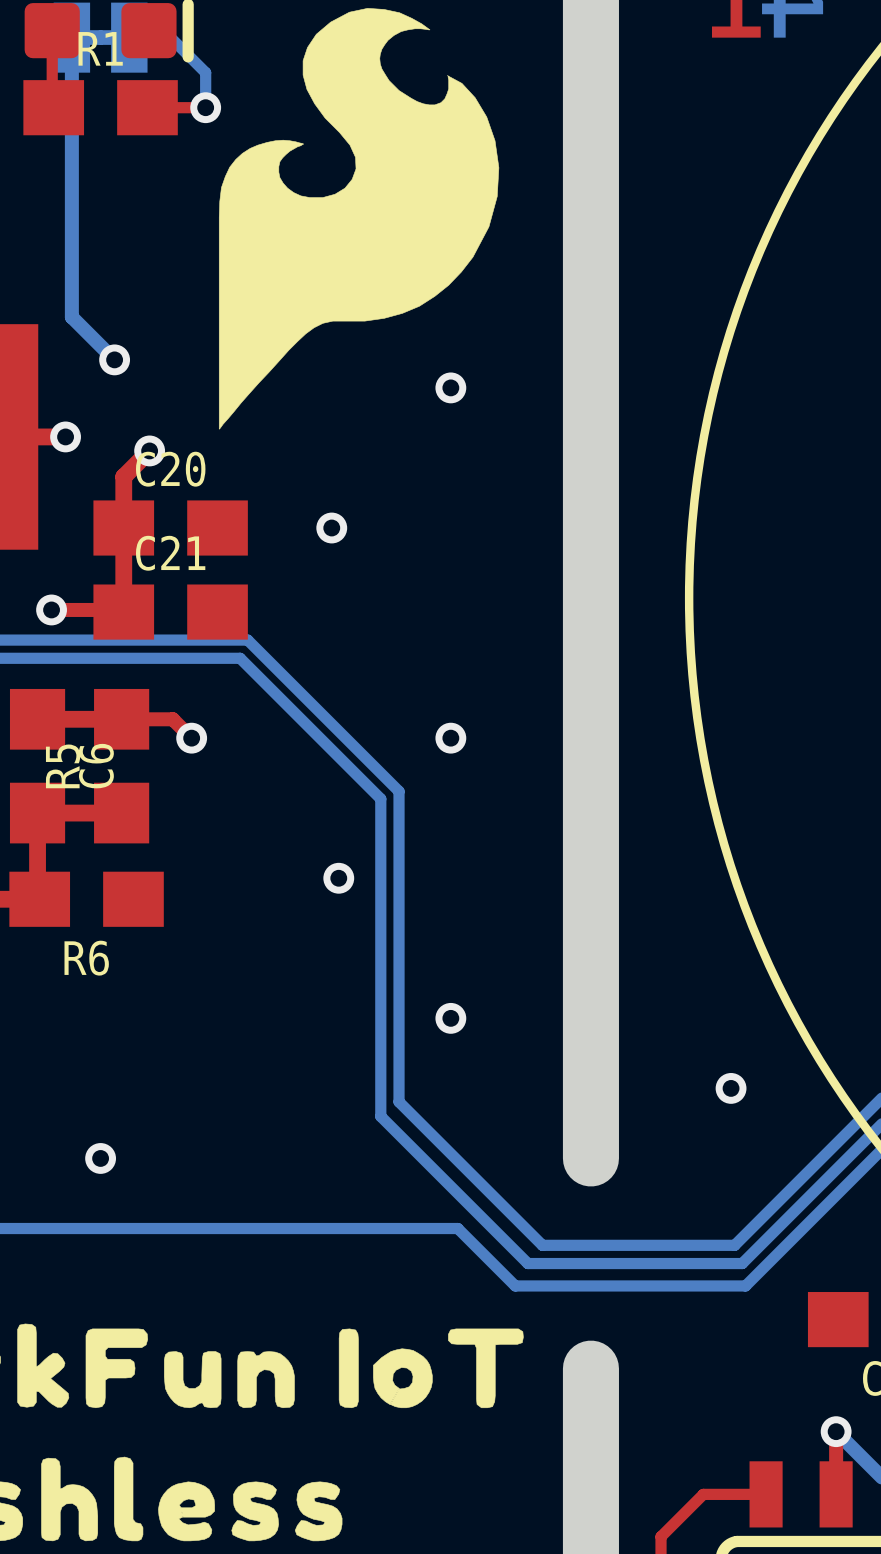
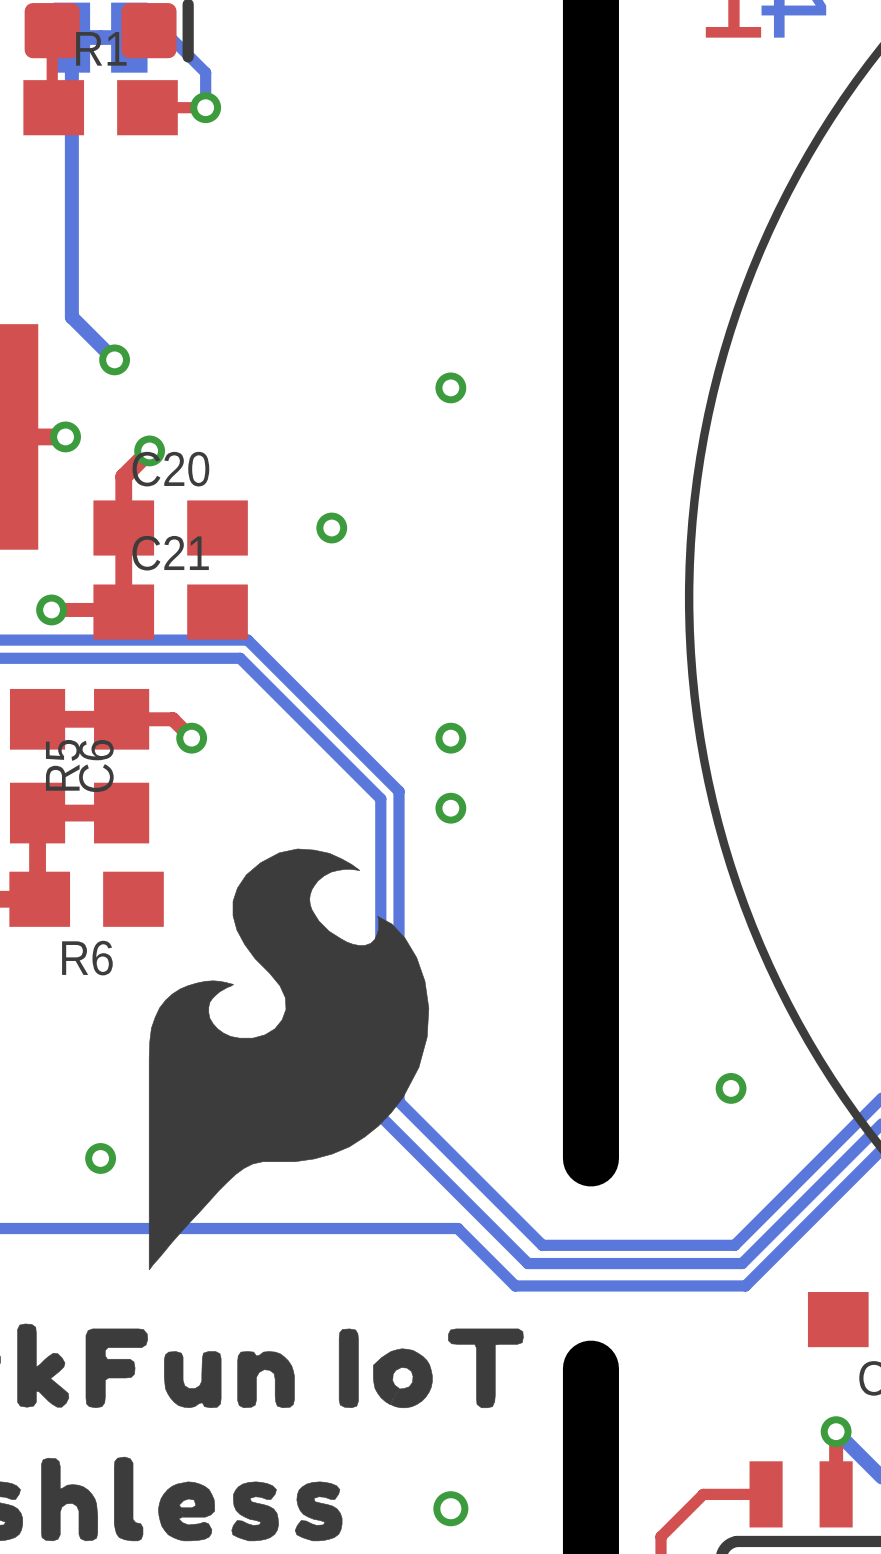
drawing position: (359, 218) -> (289, 1059)
via: none -> (450, 808)
via: (338, 878) -> none
via: (450, 1018) -> none
via: none -> (450, 1508)

